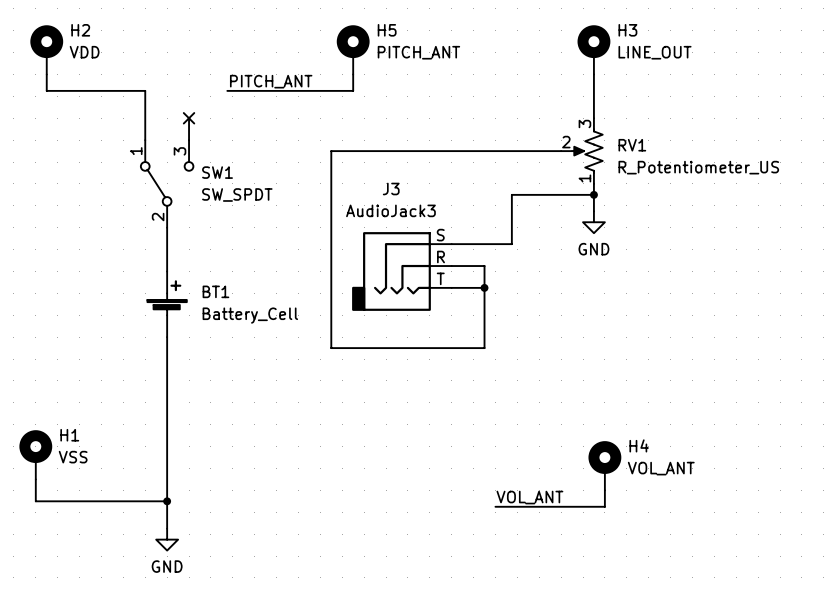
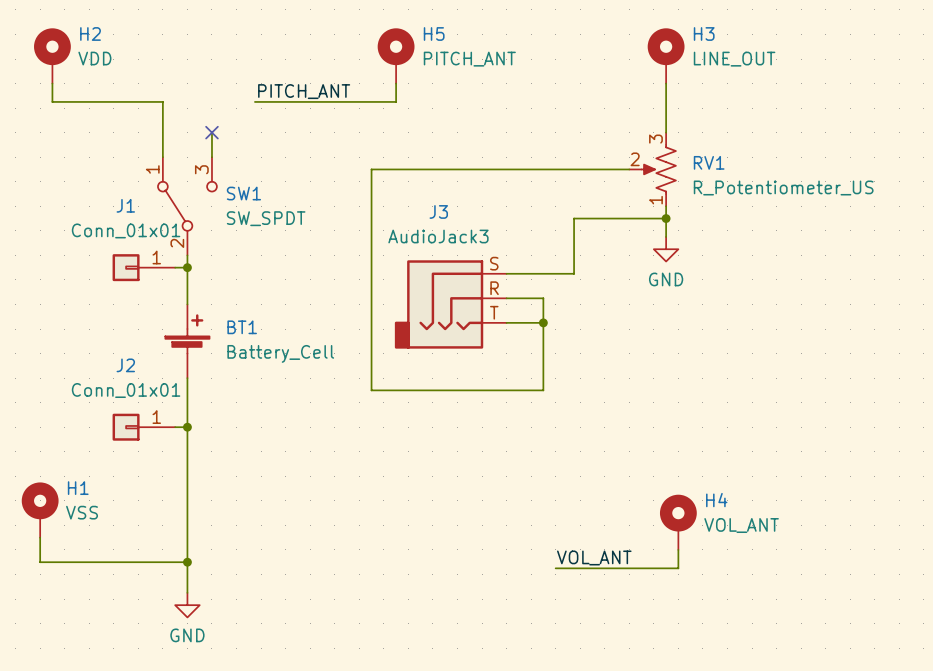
J1: none -> Conn_01x01 (143, 267)
wire: none -> (175, 267) (187, 267)
junction: none -> (187, 267)
J2: none -> Conn_01x01 (143, 427)
wire: none -> (175, 427) (187, 427)
junction: none -> (187, 427)

